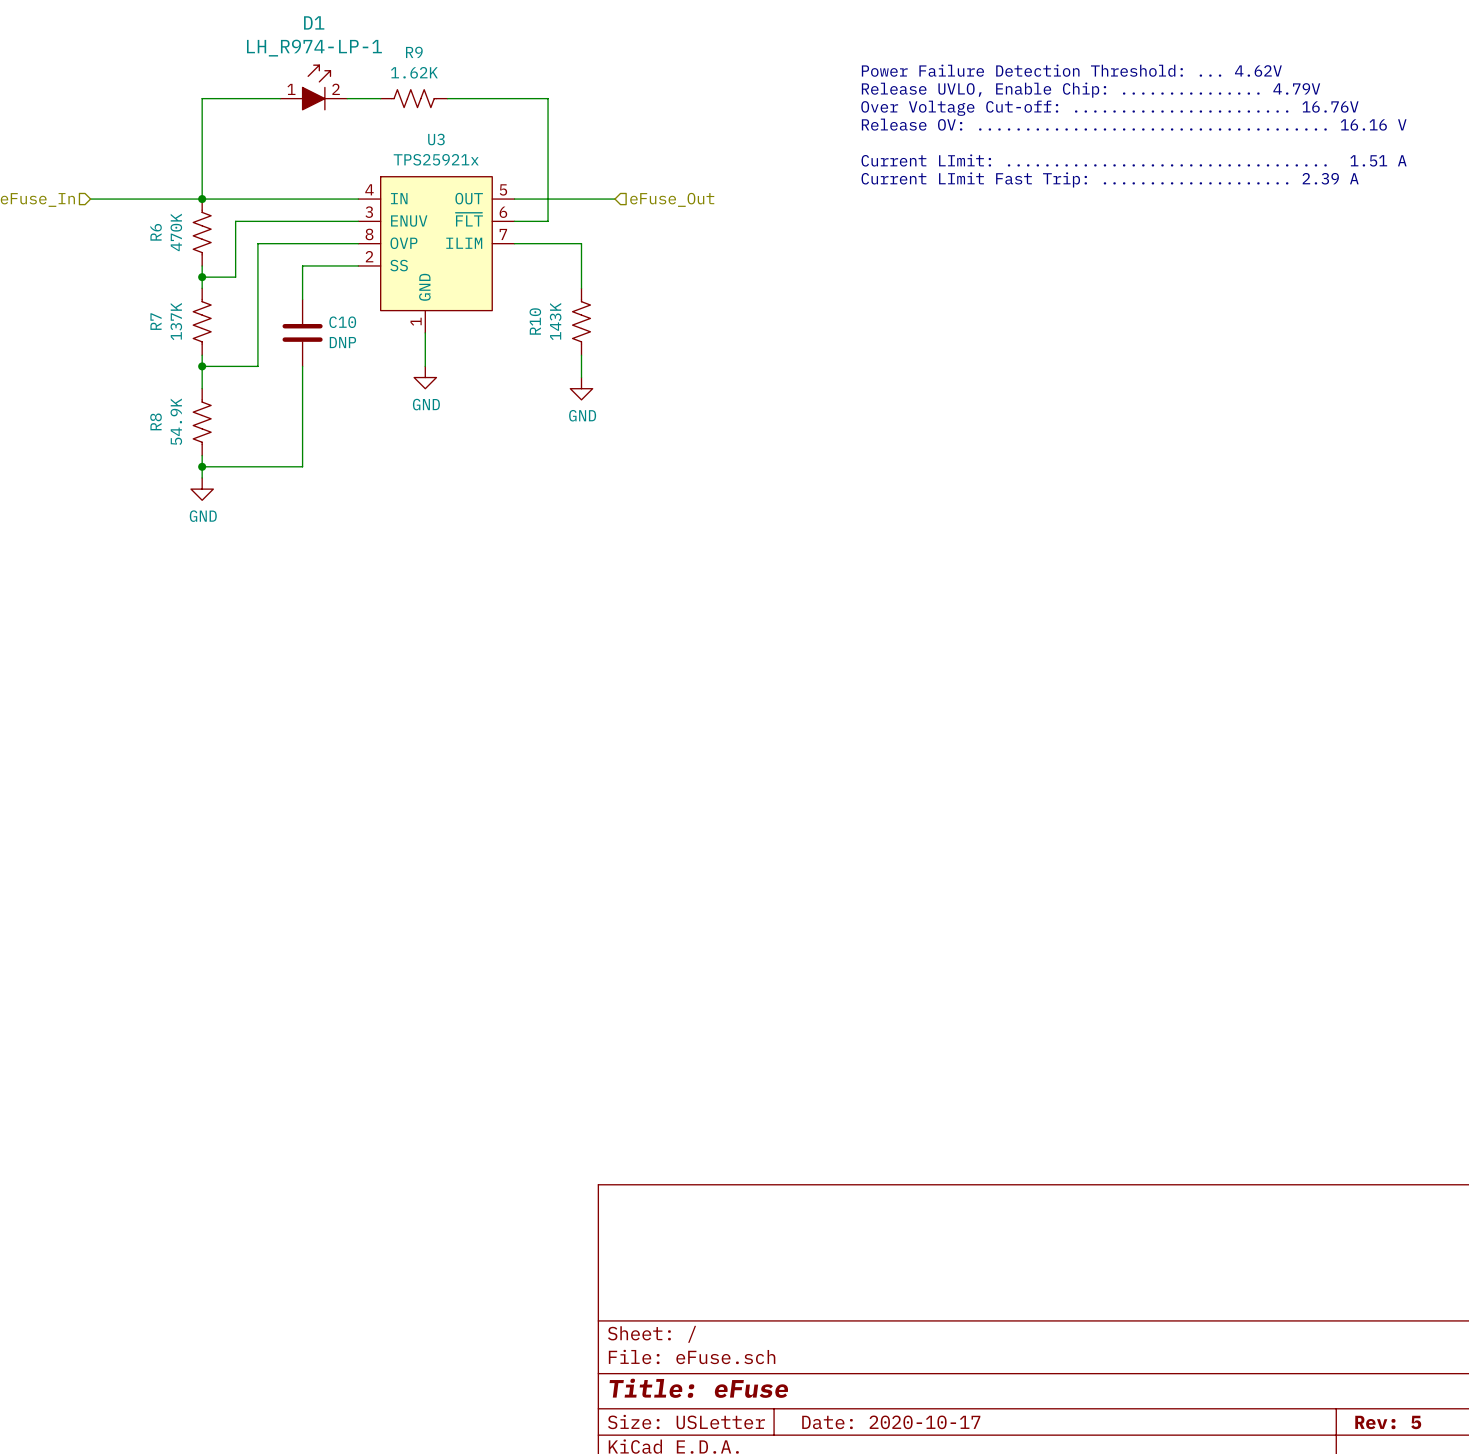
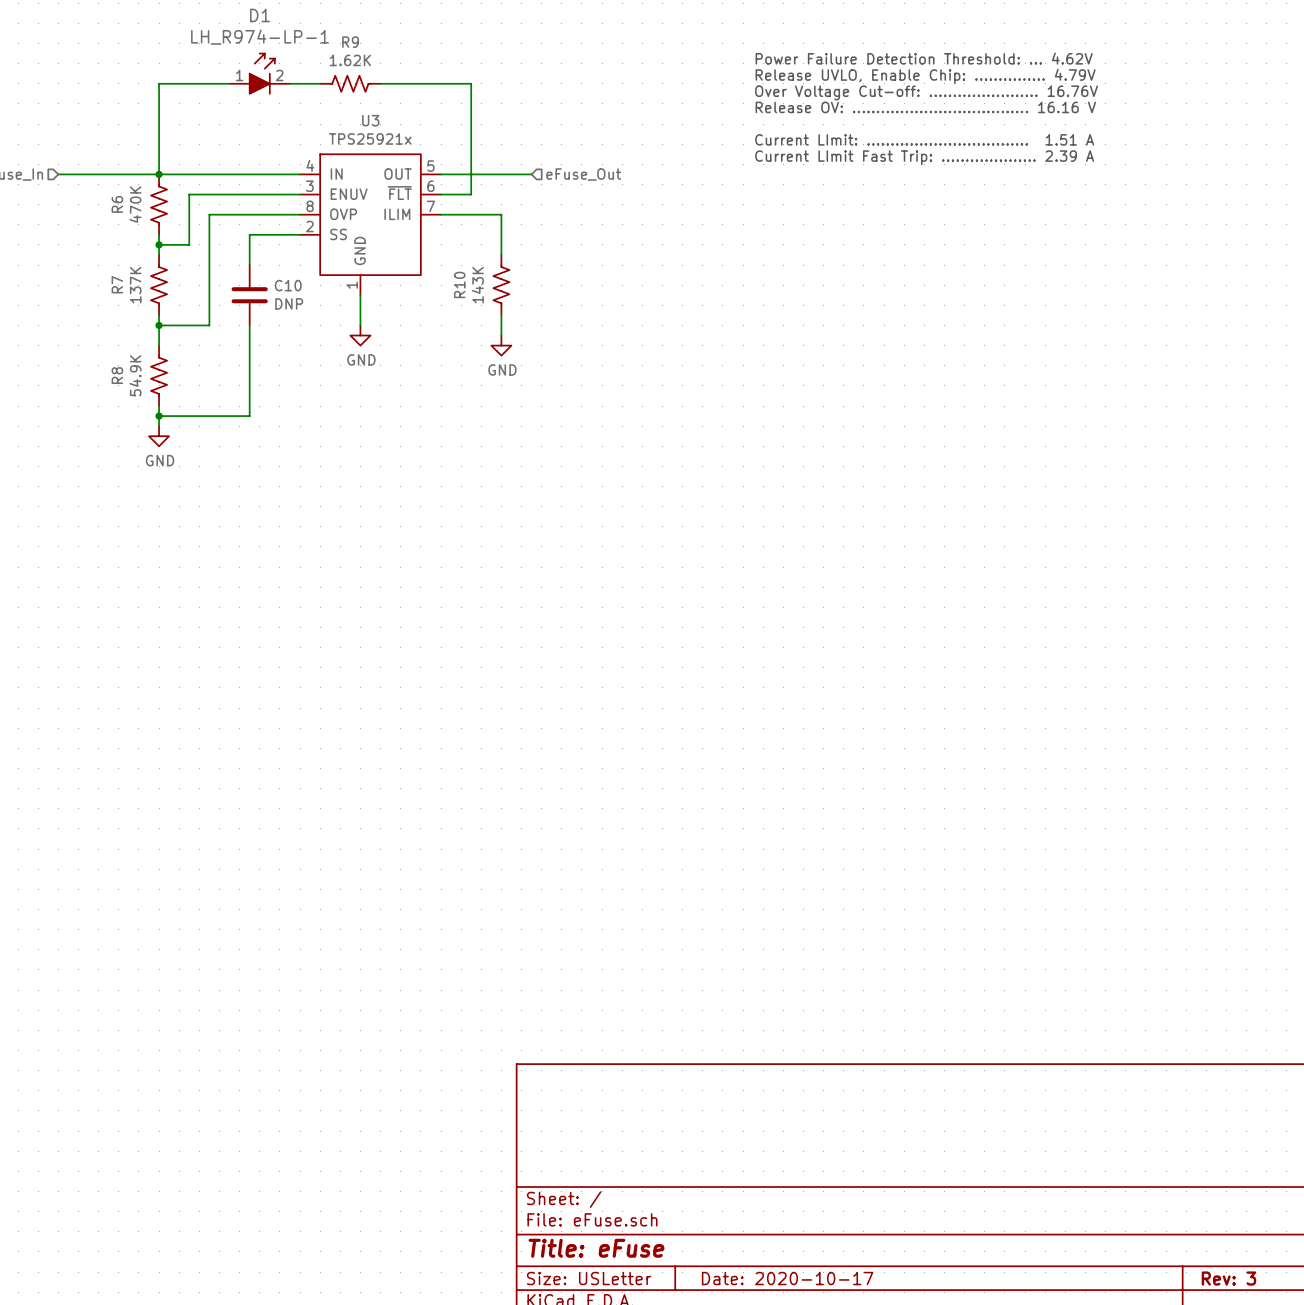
title block: Rev: 5 (1388, 1422) -> Rev: 3 (1228, 1278)

